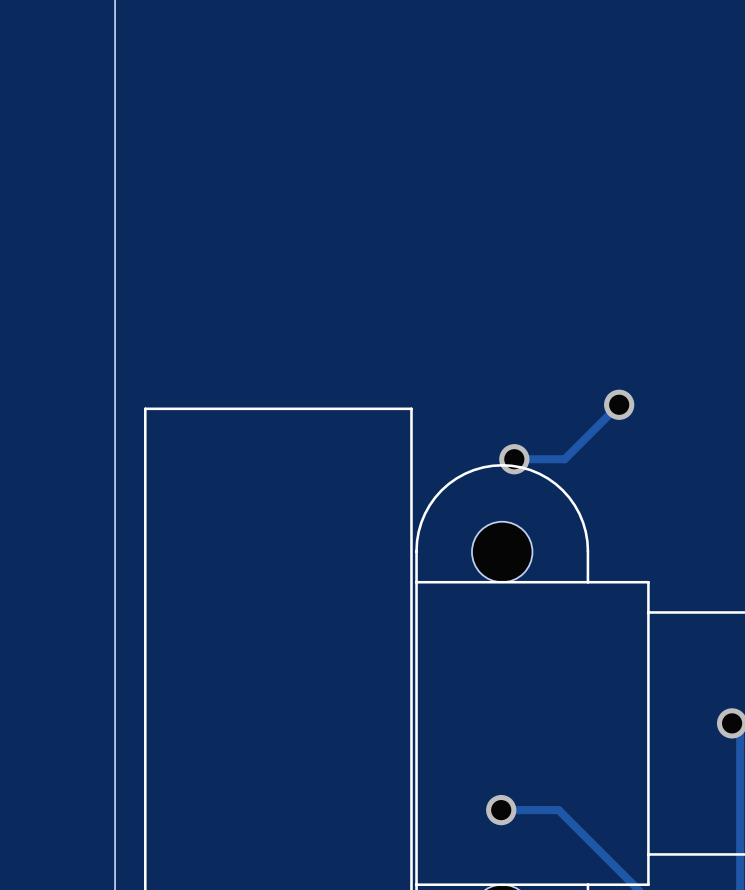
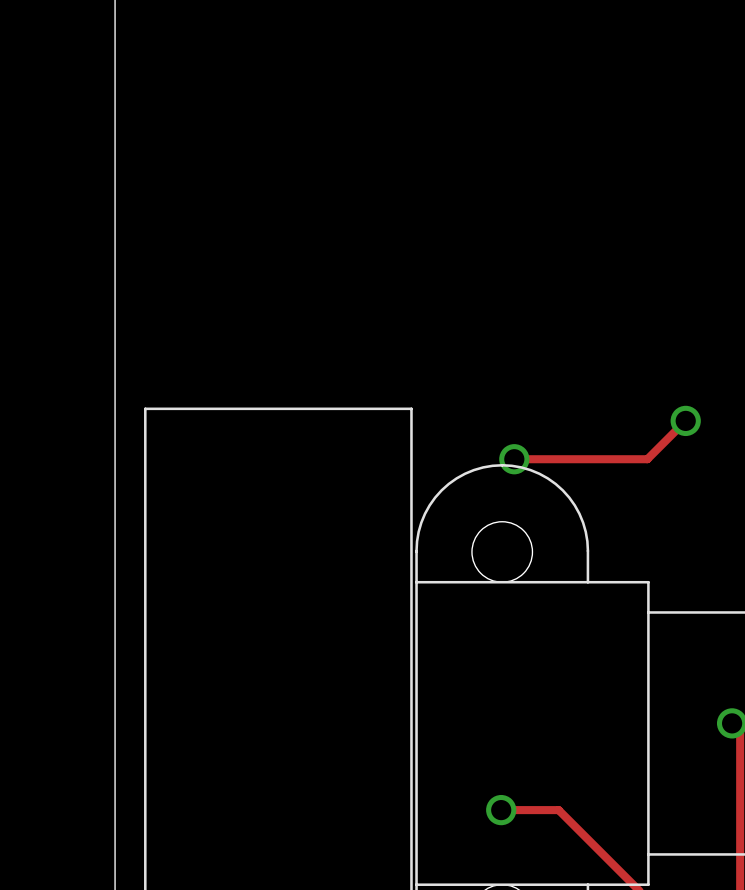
track: (619, 404) (564, 459) -> (685, 420) (647, 459) (564, 459)
via position: (619, 404) -> (685, 420)

